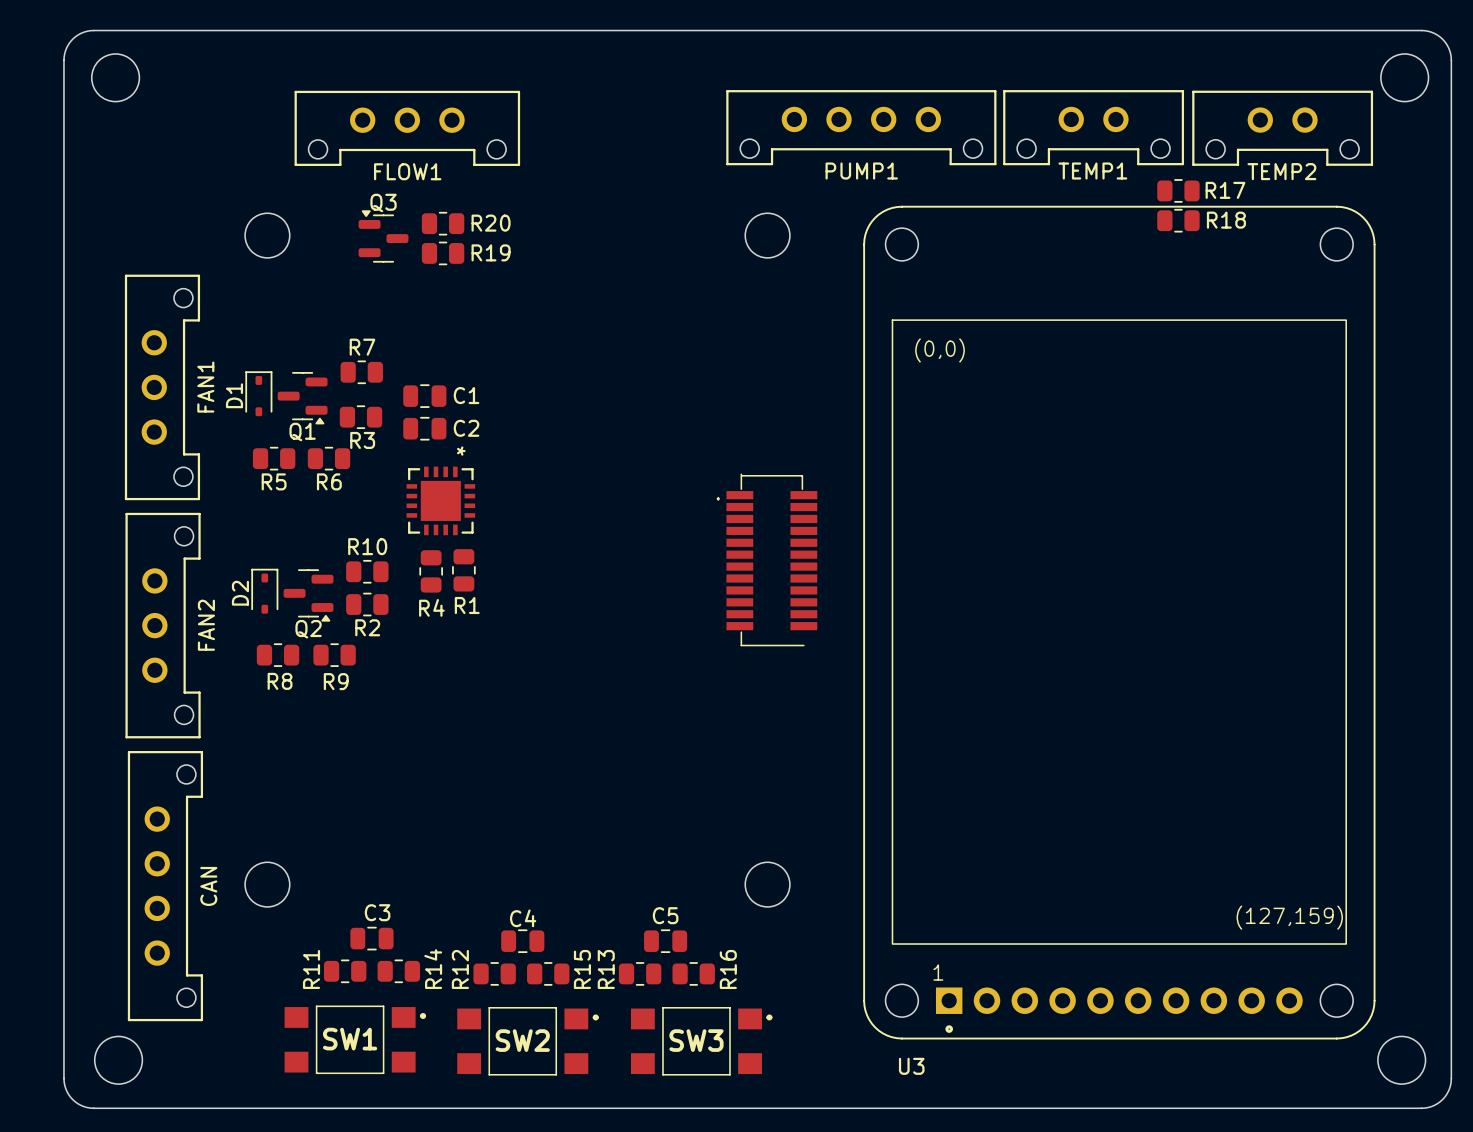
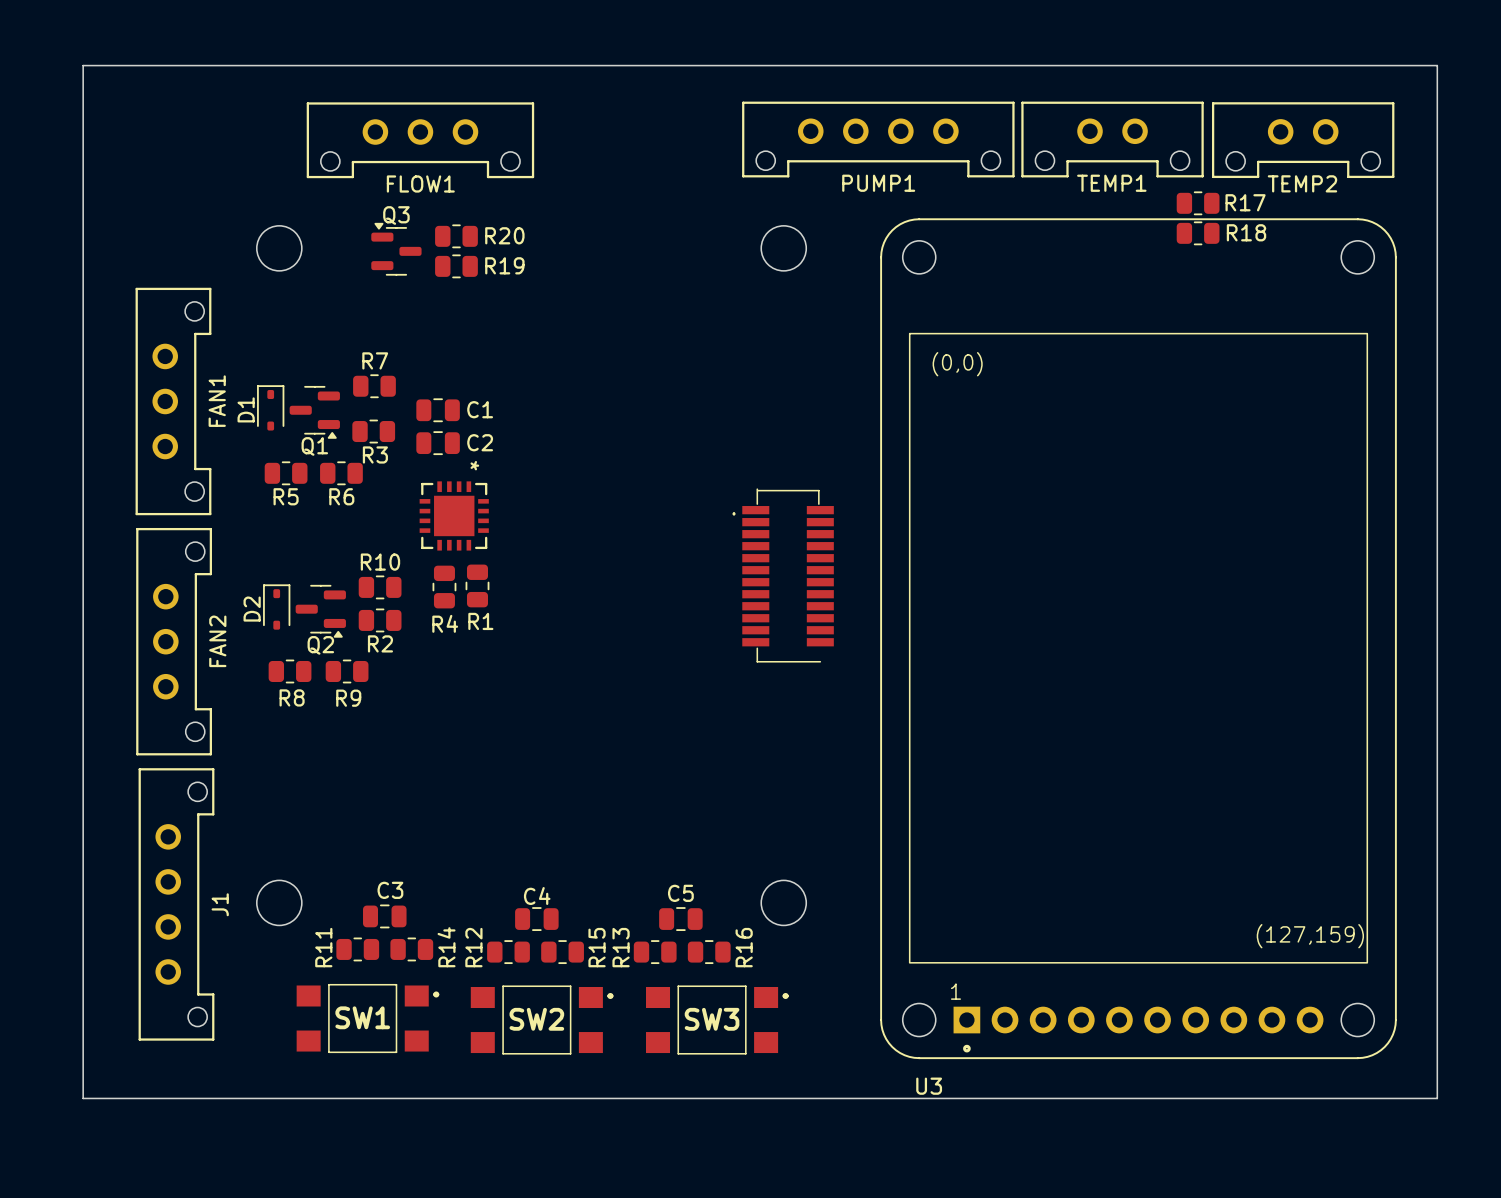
board edge: (93, 30) (1421, 30) (1431, 32) (1440, 37) (1448, 47) (1451, 60) (1451, 1078) (1449, 1088) (1444, 1097) (1434, 1105) (1421, 1108) (93, 1108) (83, 1106) (75, 1101) (66, 1091) (63, 1078) (63, 60) (66, 47) (72, 39) (80, 33) (93, 30) -> (83, 65) (83, 1098) (1437, 1098) (1437, 65) (83, 65)
round board edge: [91, 53, 140, 102] -> none
round board edge: [1380, 53, 1429, 102] -> none
CAN name: CAN (208, 886) -> J1 (220, 904)
C3 position: (371, 938) -> (384, 916)
C4 position: (522, 941) -> (536, 919)
C5 position: (665, 941) -> (680, 919)
R11 position: (345, 971) -> (357, 949)
R14 position: (398, 971) -> (411, 949)
R12 position: (494, 973) -> (508, 952)
R15 position: (548, 973) -> (562, 952)
R13 position: (640, 973) -> (655, 952)
R16 position: (693, 973) -> (709, 952)
round board edge: [94, 1036, 143, 1085] -> none
round board edge: [1377, 1036, 1426, 1085] -> none
SW1 position: (355, 1039) -> (367, 1018)
SW2 position: (527, 1041) -> (542, 1020)
SW3 position: (701, 1041) -> (717, 1020)

